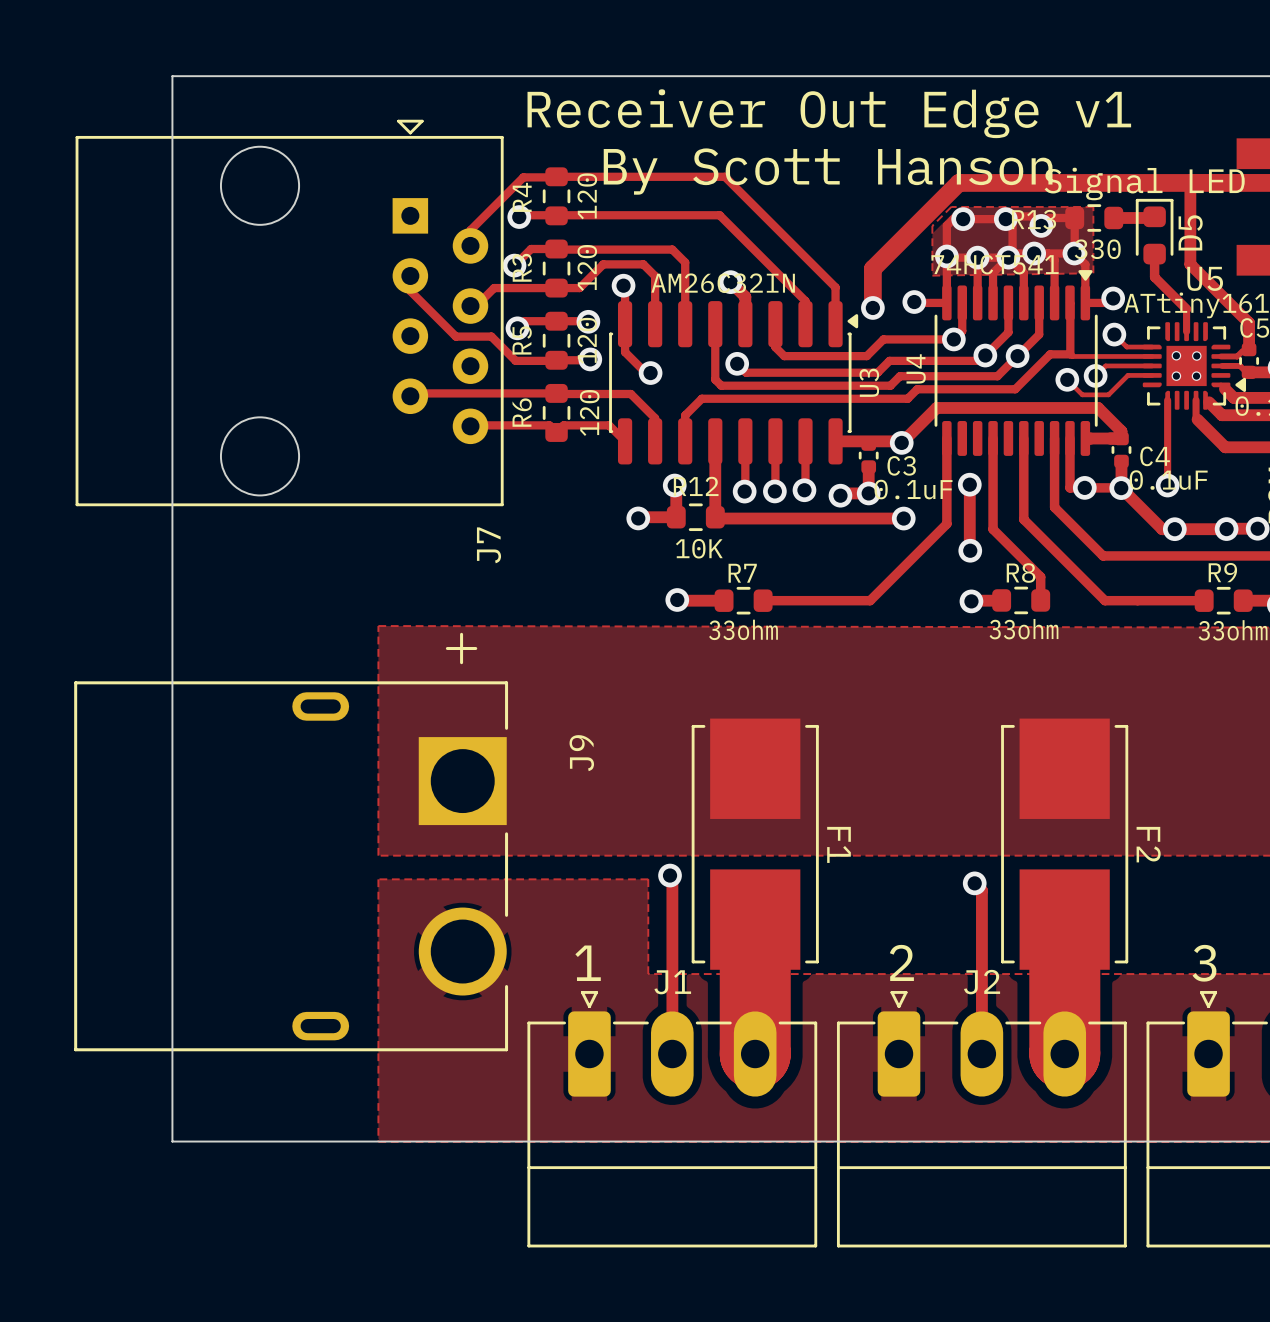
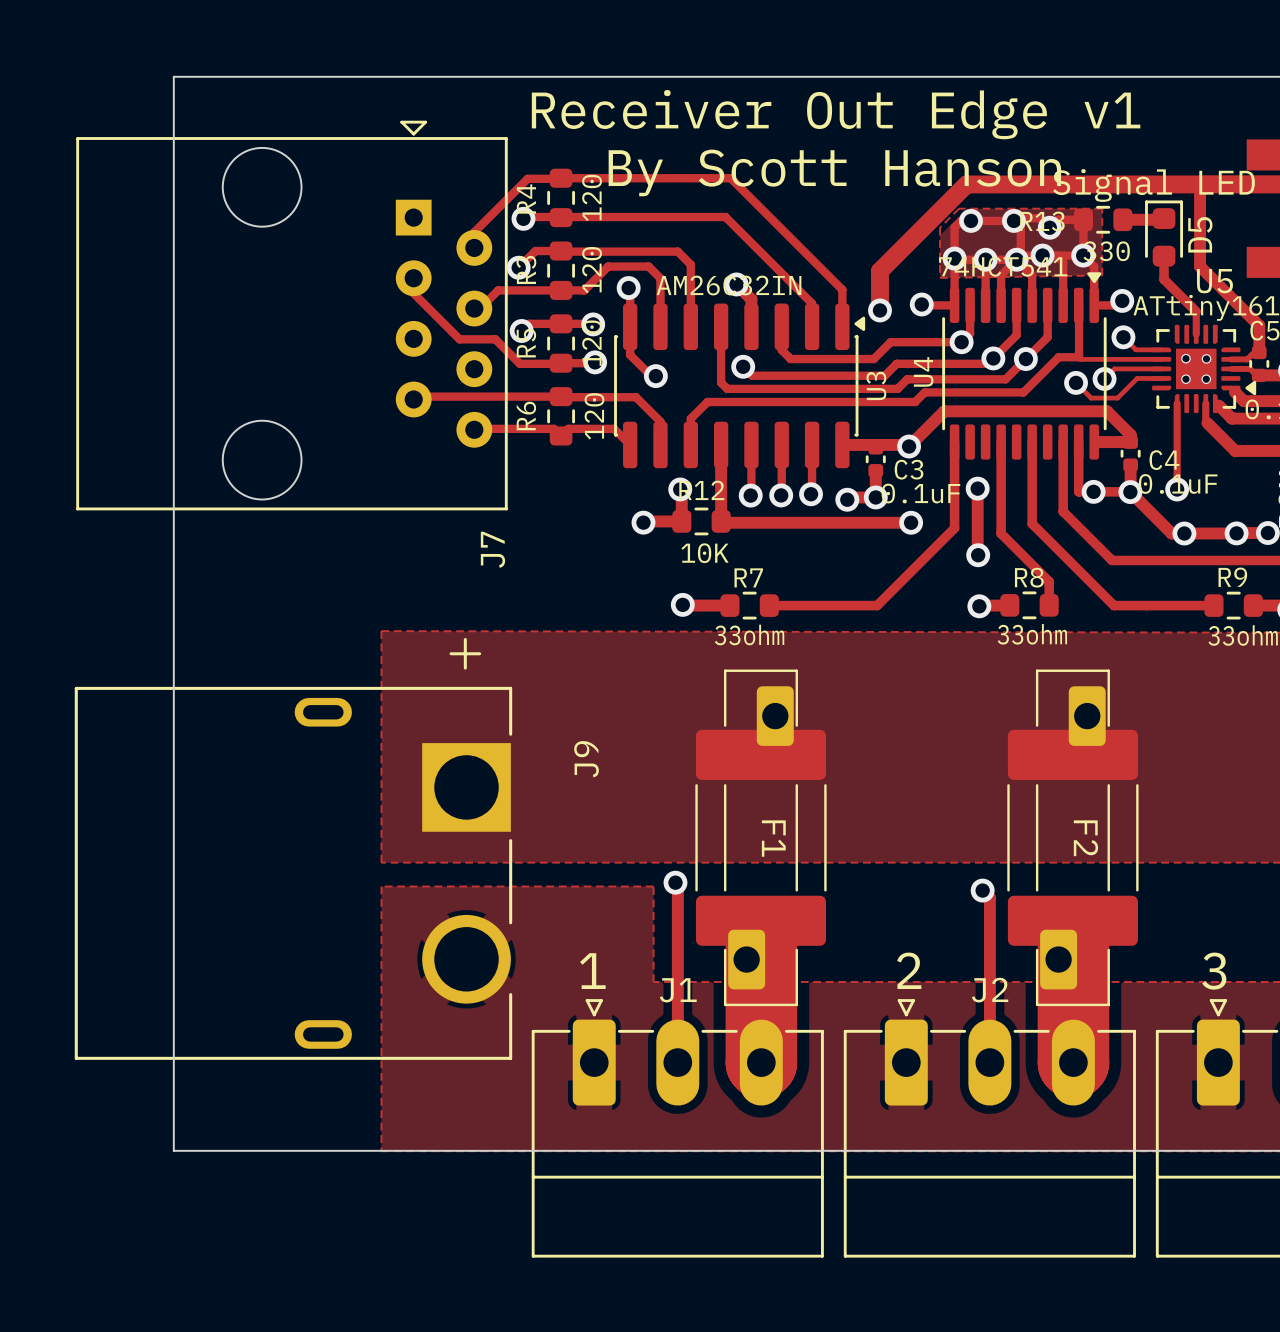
F1 footprint: [691, 718, 819, 970] -> [695, 669, 827, 1007]
F2 footprint: [1001, 718, 1129, 970] -> [1007, 669, 1139, 1007]
F1 name position: F1 (839, 844) -> F1 (773, 838)
F2 name position: F2 (1148, 844) -> F2 (1085, 838)

